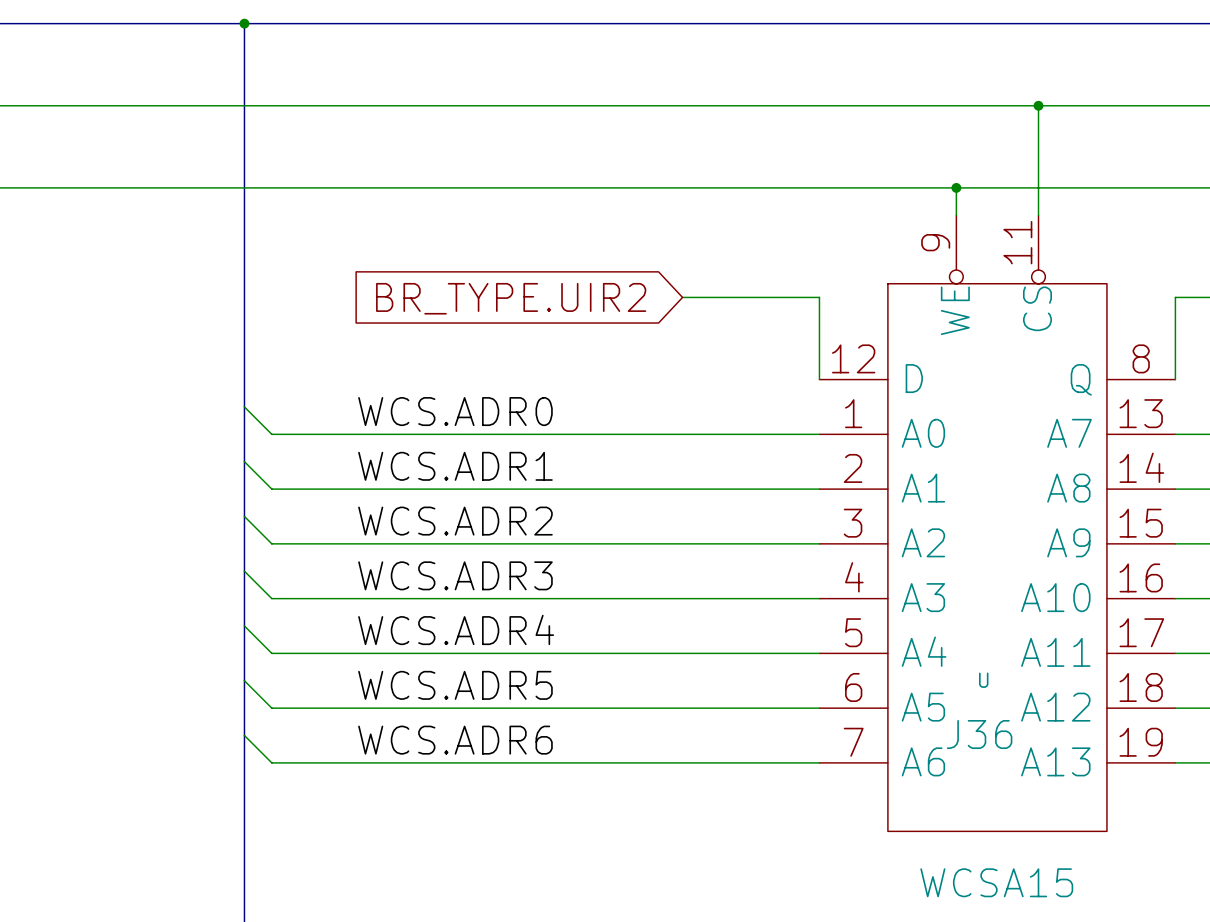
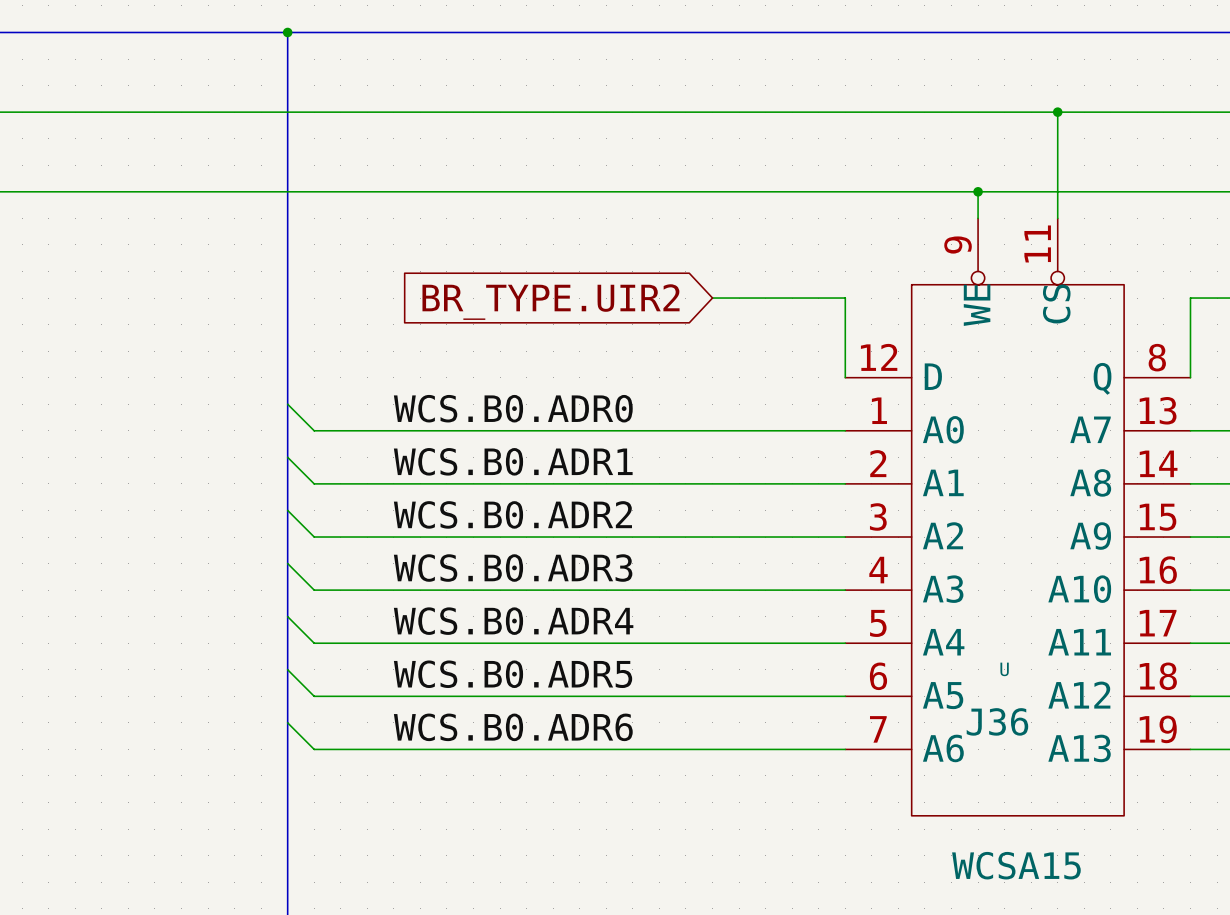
label: WCS.ADR0 (455, 411) -> WCS.B0.ADR0 (513, 408)
label: WCS.ADR1 (455, 466) -> WCS.B0.ADR1 (513, 461)
label: WCS.ADR2 (455, 521) -> WCS.B0.ADR2 (512, 514)
label: WCS.ADR3 (455, 575) -> WCS.B0.ADR3 (513, 568)
label: WCS.ADR4 (456, 629) -> WCS.B0.ADR4 (513, 621)
label: WCS.ADR5 (455, 685) -> WCS.B0.ADR5 (513, 674)
label: WCS.ADR6 (455, 740) -> WCS.B0.ADR6 (513, 727)

